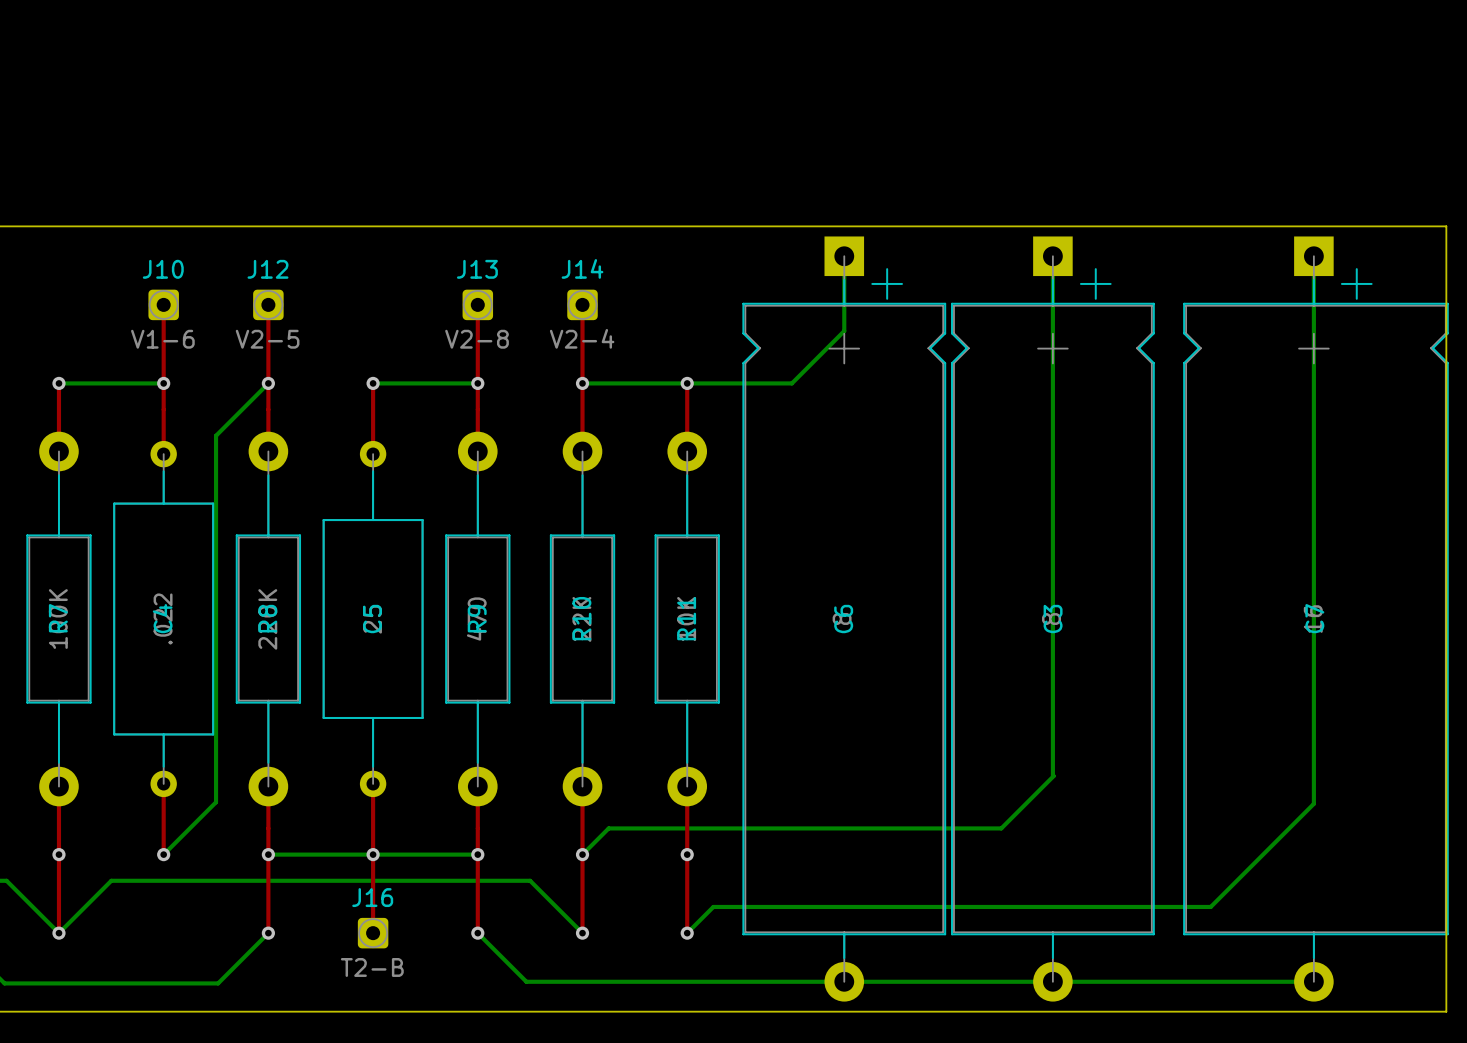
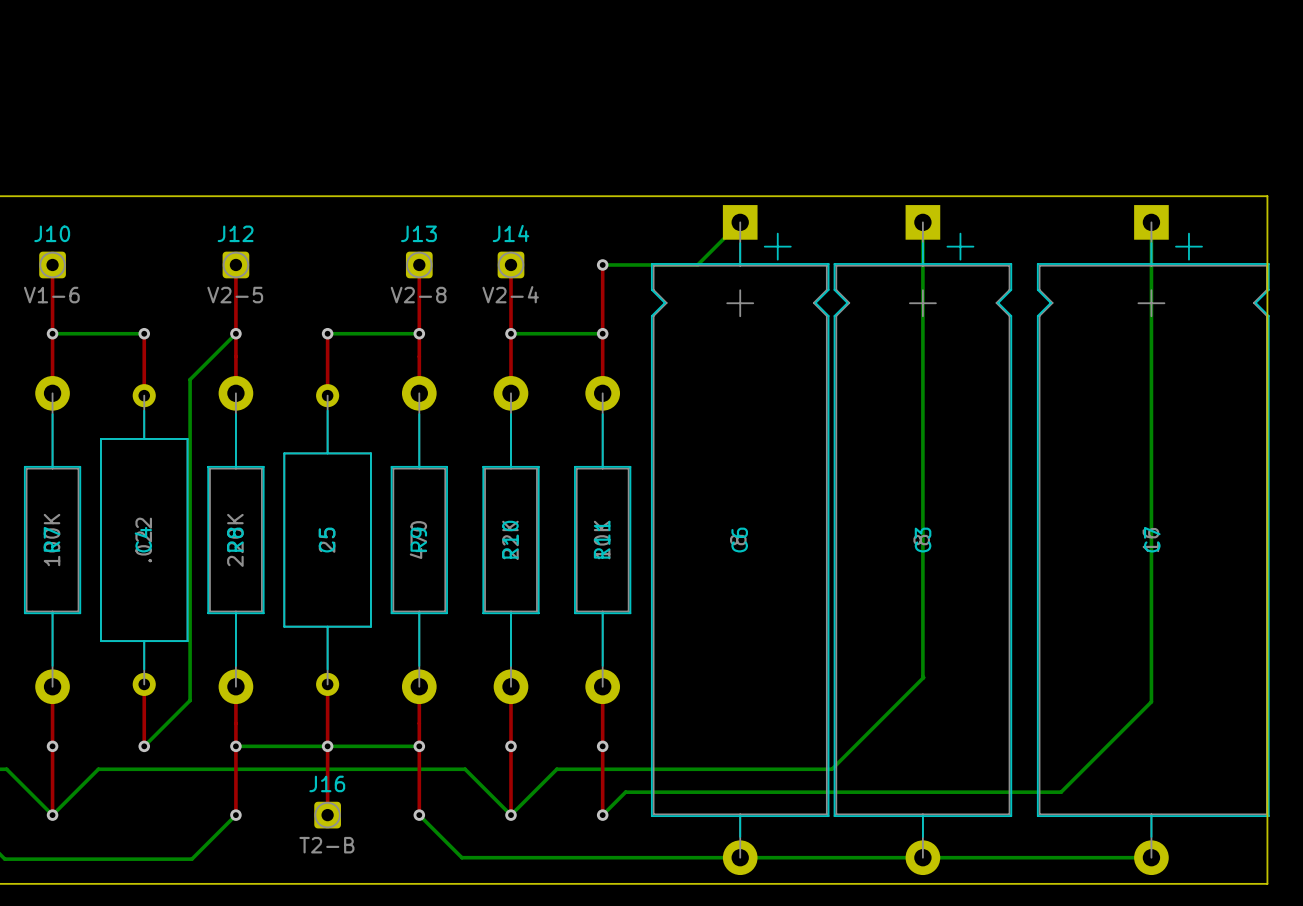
bottom track: (844, 256) (844, 331) (791, 383) (687, 383) -> (740, 222) (697, 264) (602, 264)
top track: (163, 304) (163, 383) -> (52, 264) (52, 333)
J10 position: (163, 304) -> (52, 264)
top track: none -> (602, 264) (602, 333)
via: none -> (602, 264)
bottom track: (1001, 828) (608, 828) (582, 854) -> (877, 723) (831, 769) (556, 769) (510, 815)

